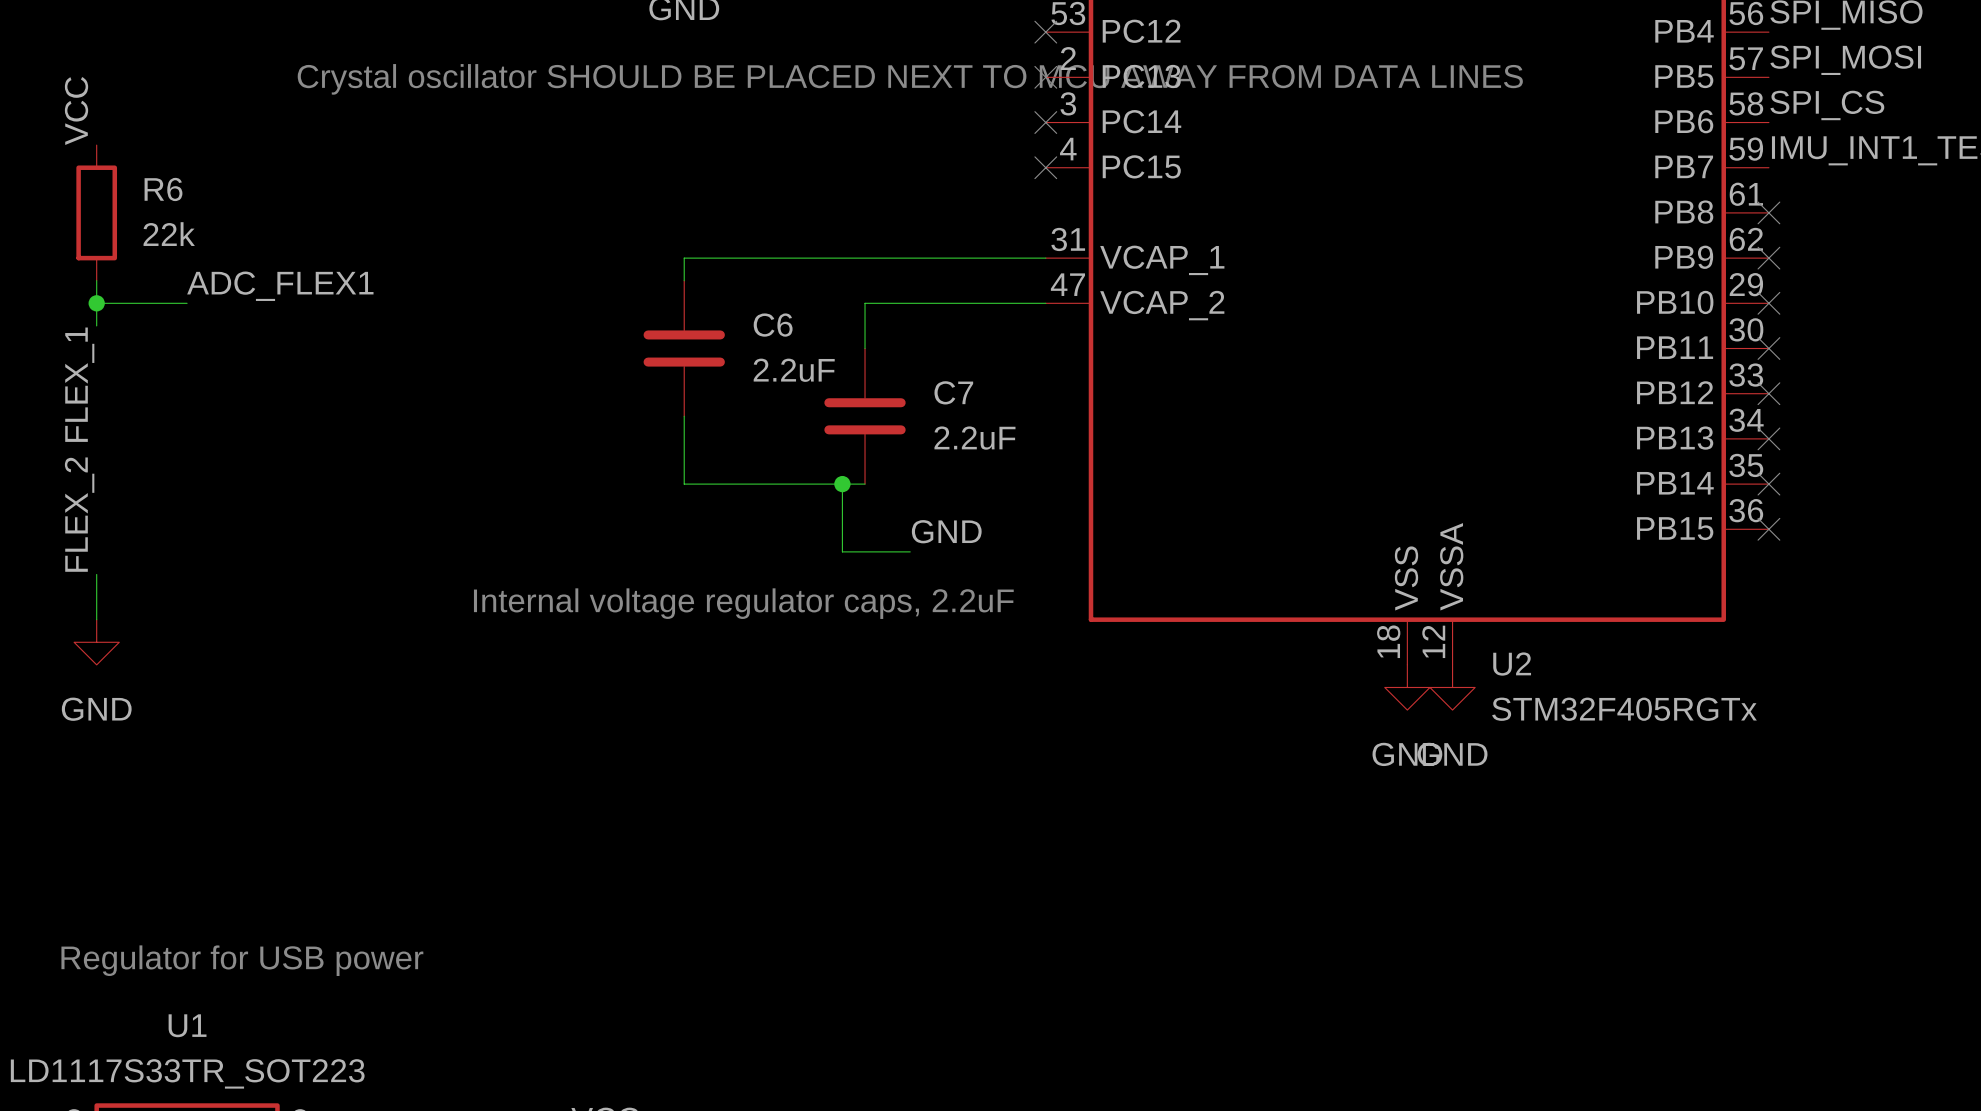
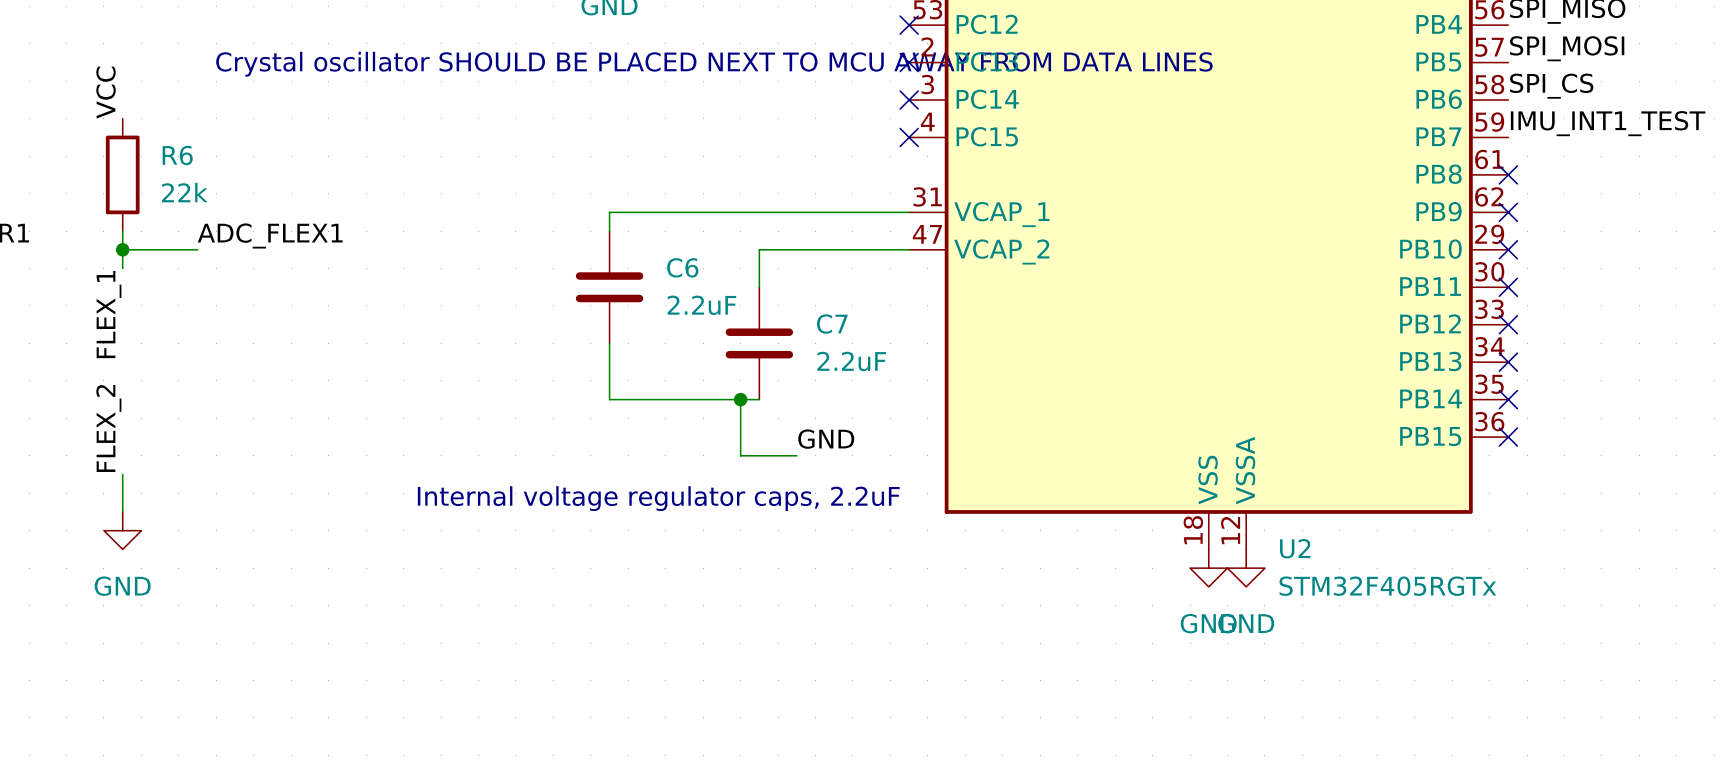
text position: Crystal oscillator SHOULD BE PLACED NEXT TO MCU AWAY FROM DATA LINES (910, 79) -> Crystal oscillator SHOULD BE PLACED NEXT TO MCU AWAY FROM DATA LINES (714, 64)

